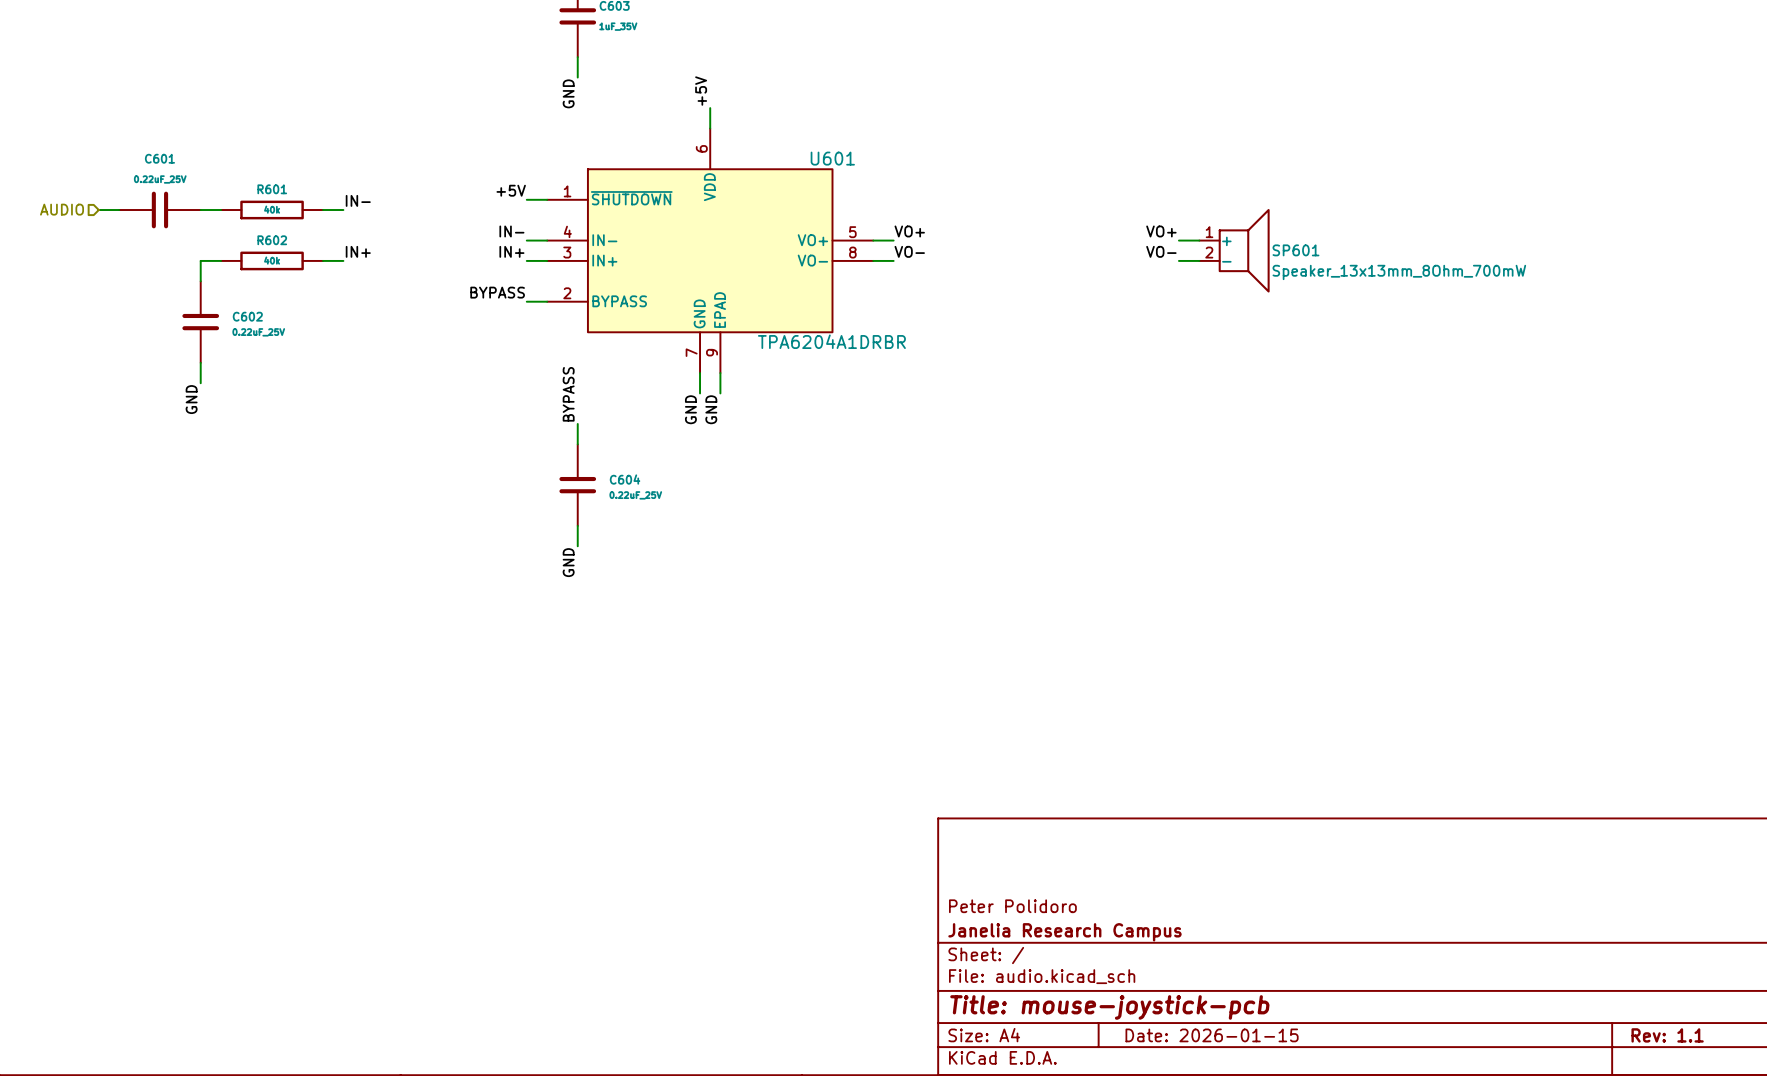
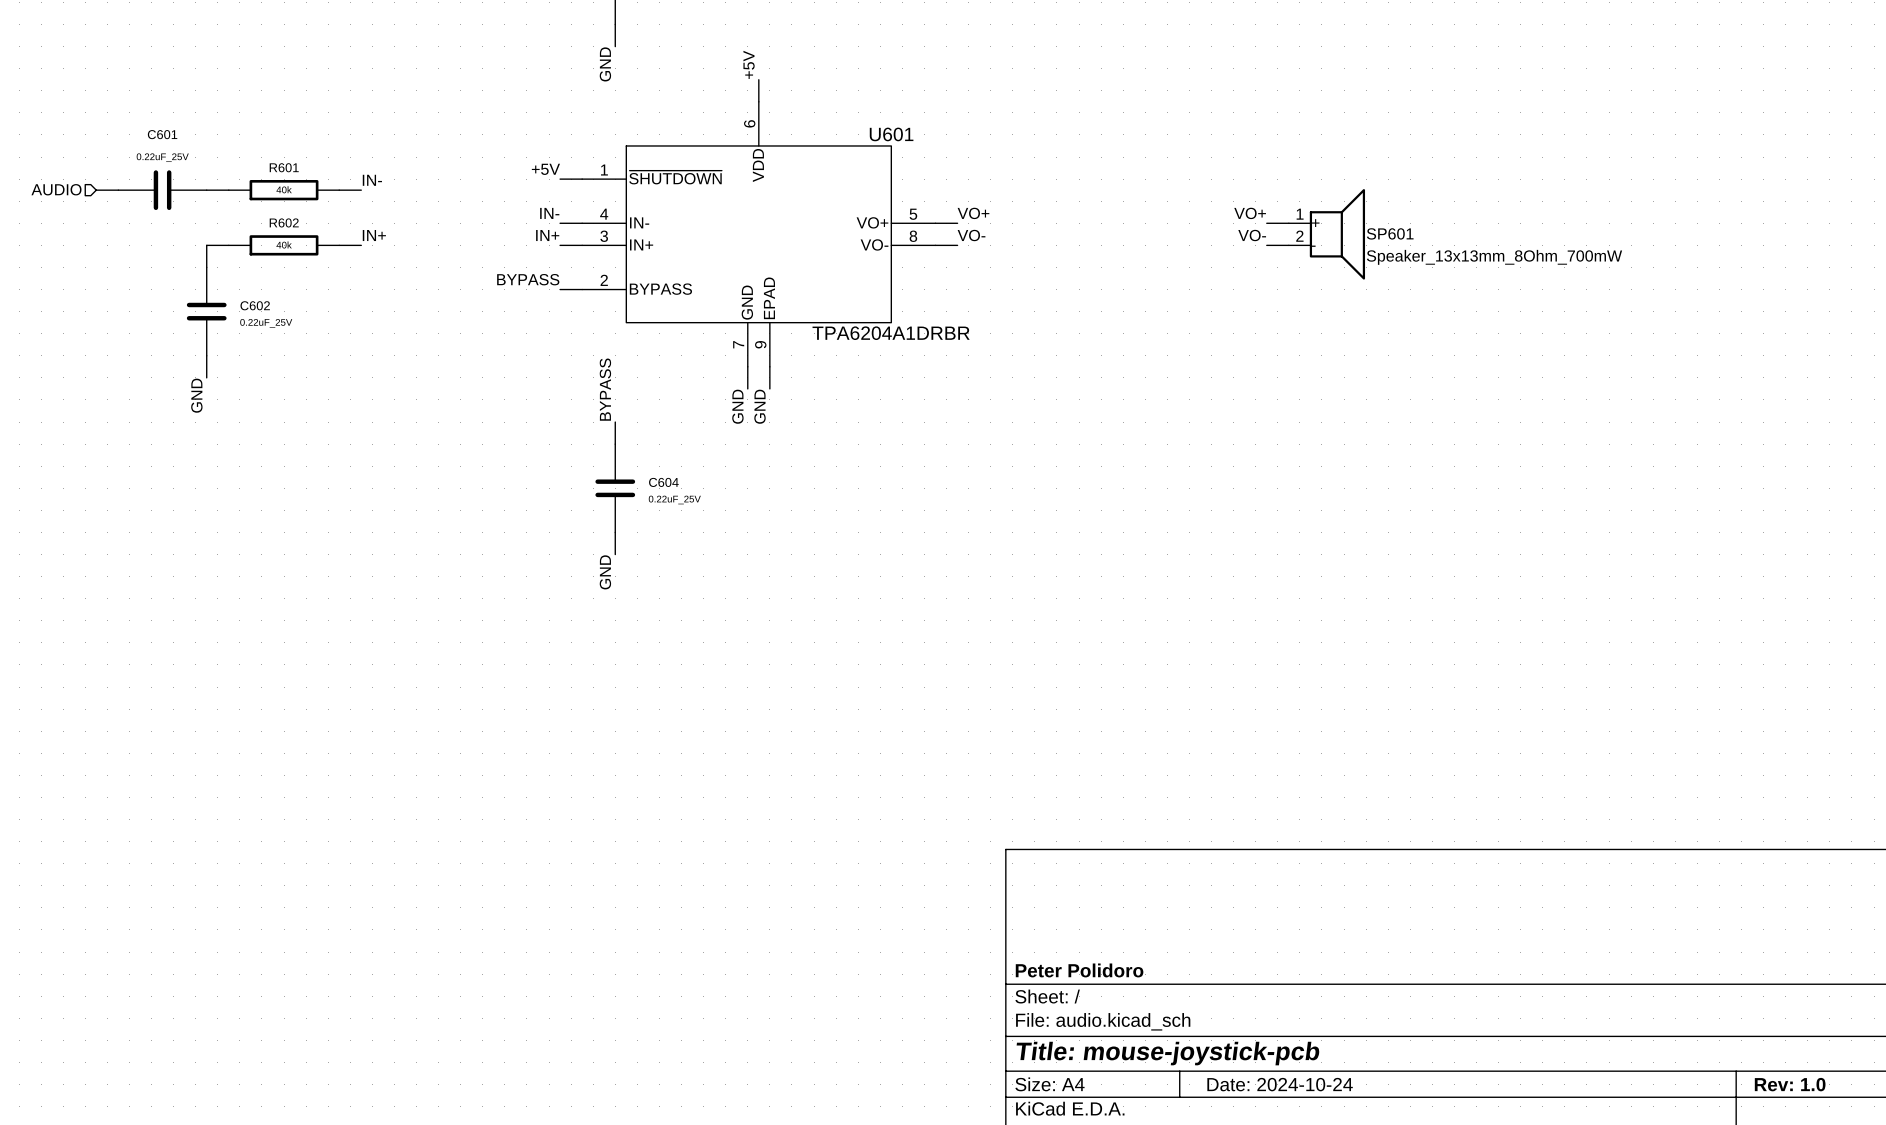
title block: Peter Polidoro (1012, 906) -> none
title block: Janelia Research Campus (1064, 932) -> Peter Polidoro (1079, 970)
title block: Date: 2026-01-15 (1212, 1035) -> Date: 2024-10-24 (1280, 1084)
title block: Rev: 1.1 (1667, 1035) -> Rev: 1.0 (1790, 1084)

